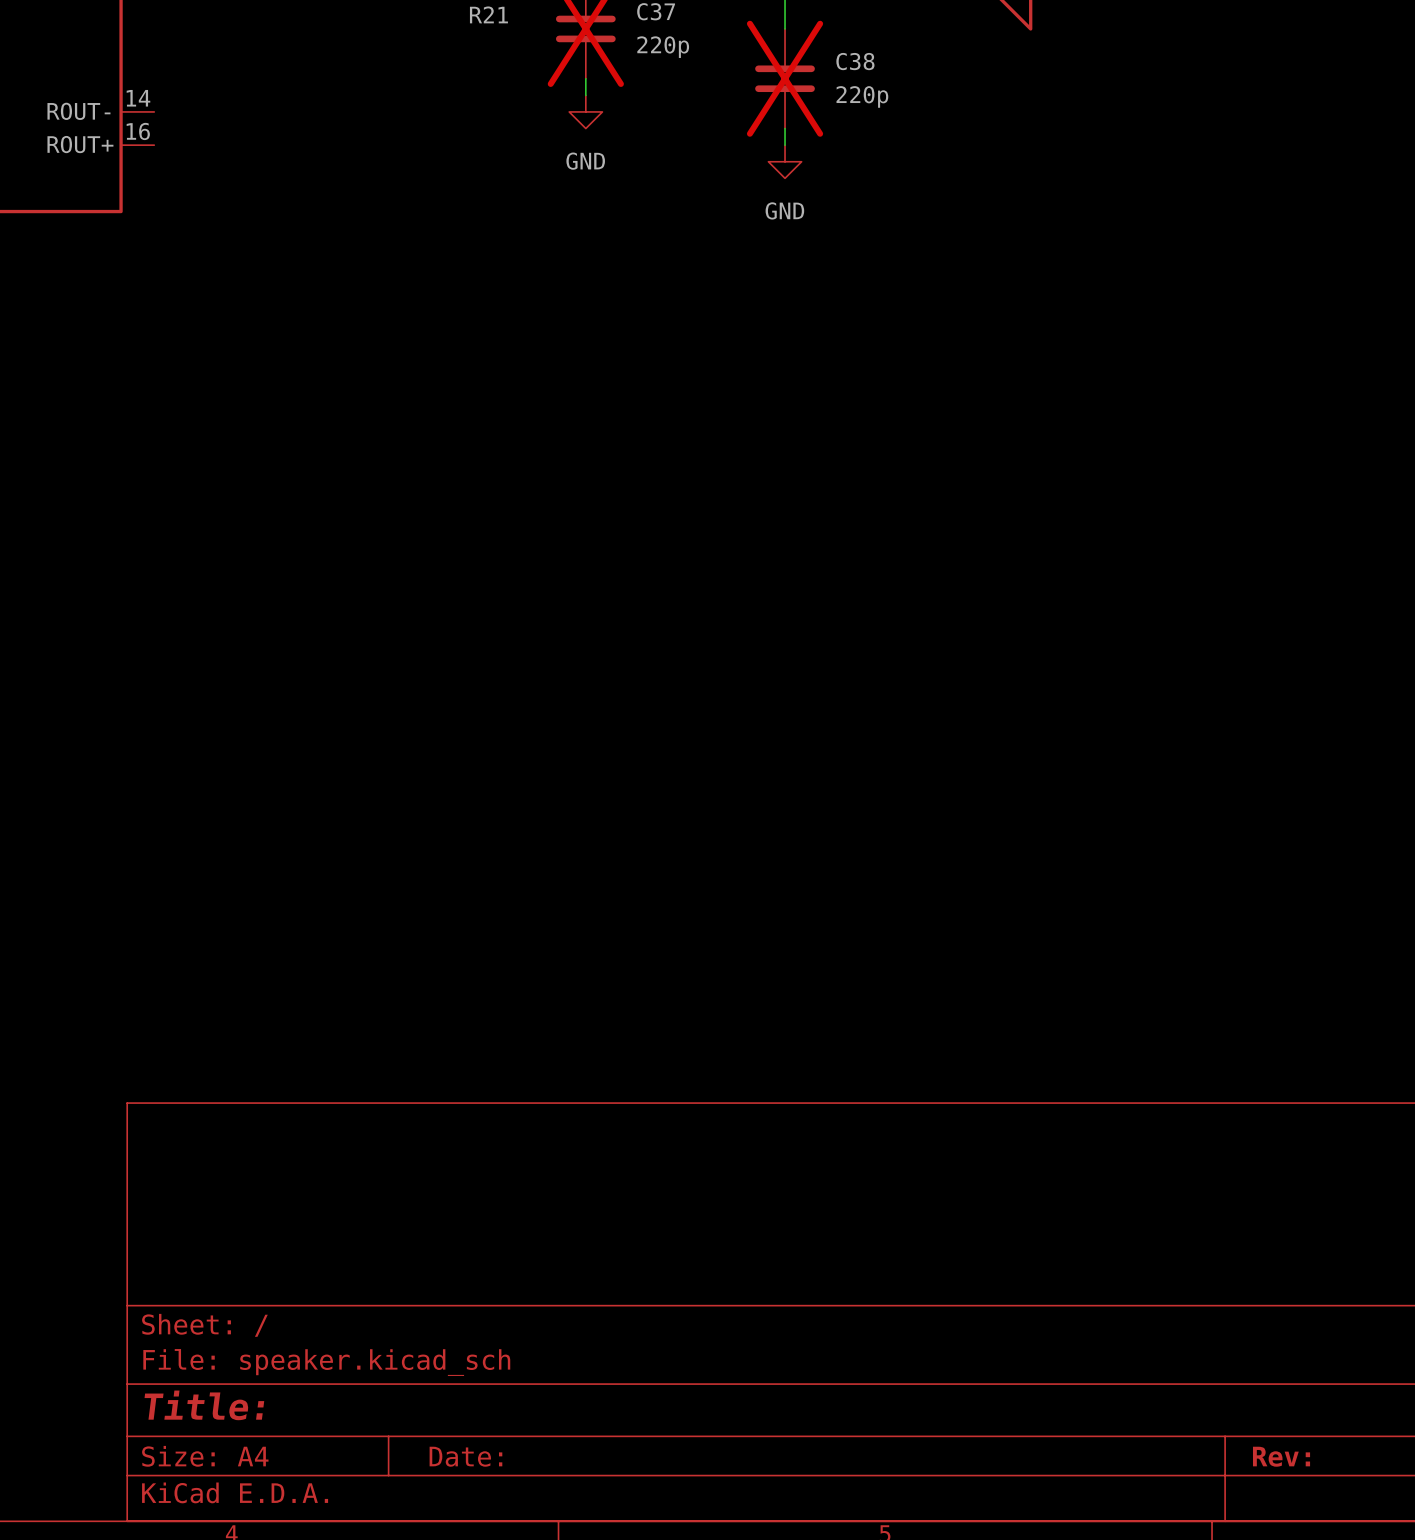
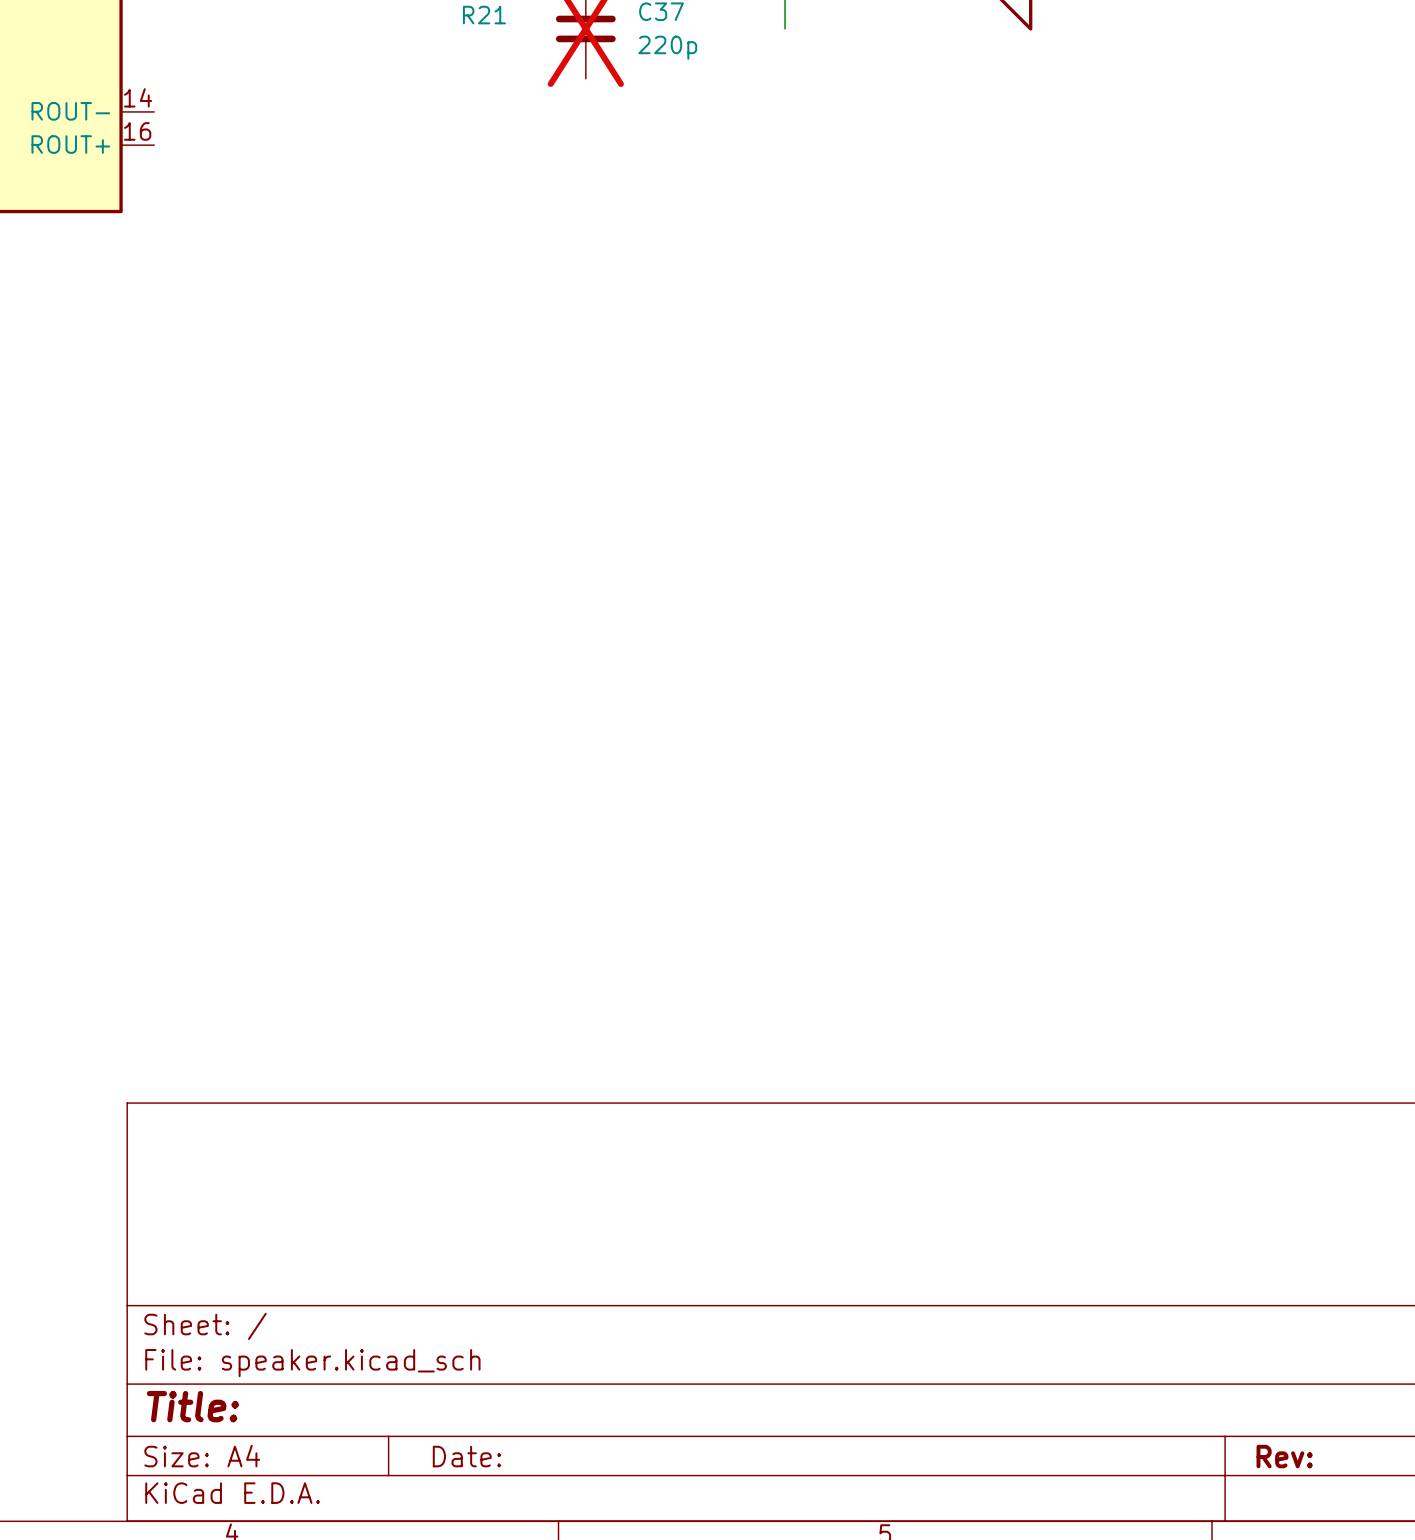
wire: (585, 78) (585, 95) -> none
C38: 220p (785, 78) -> none
power symbol: GND (585, 111) -> none
wire: (785, 128) (785, 145) -> none
power symbol: GND (785, 161) -> none

